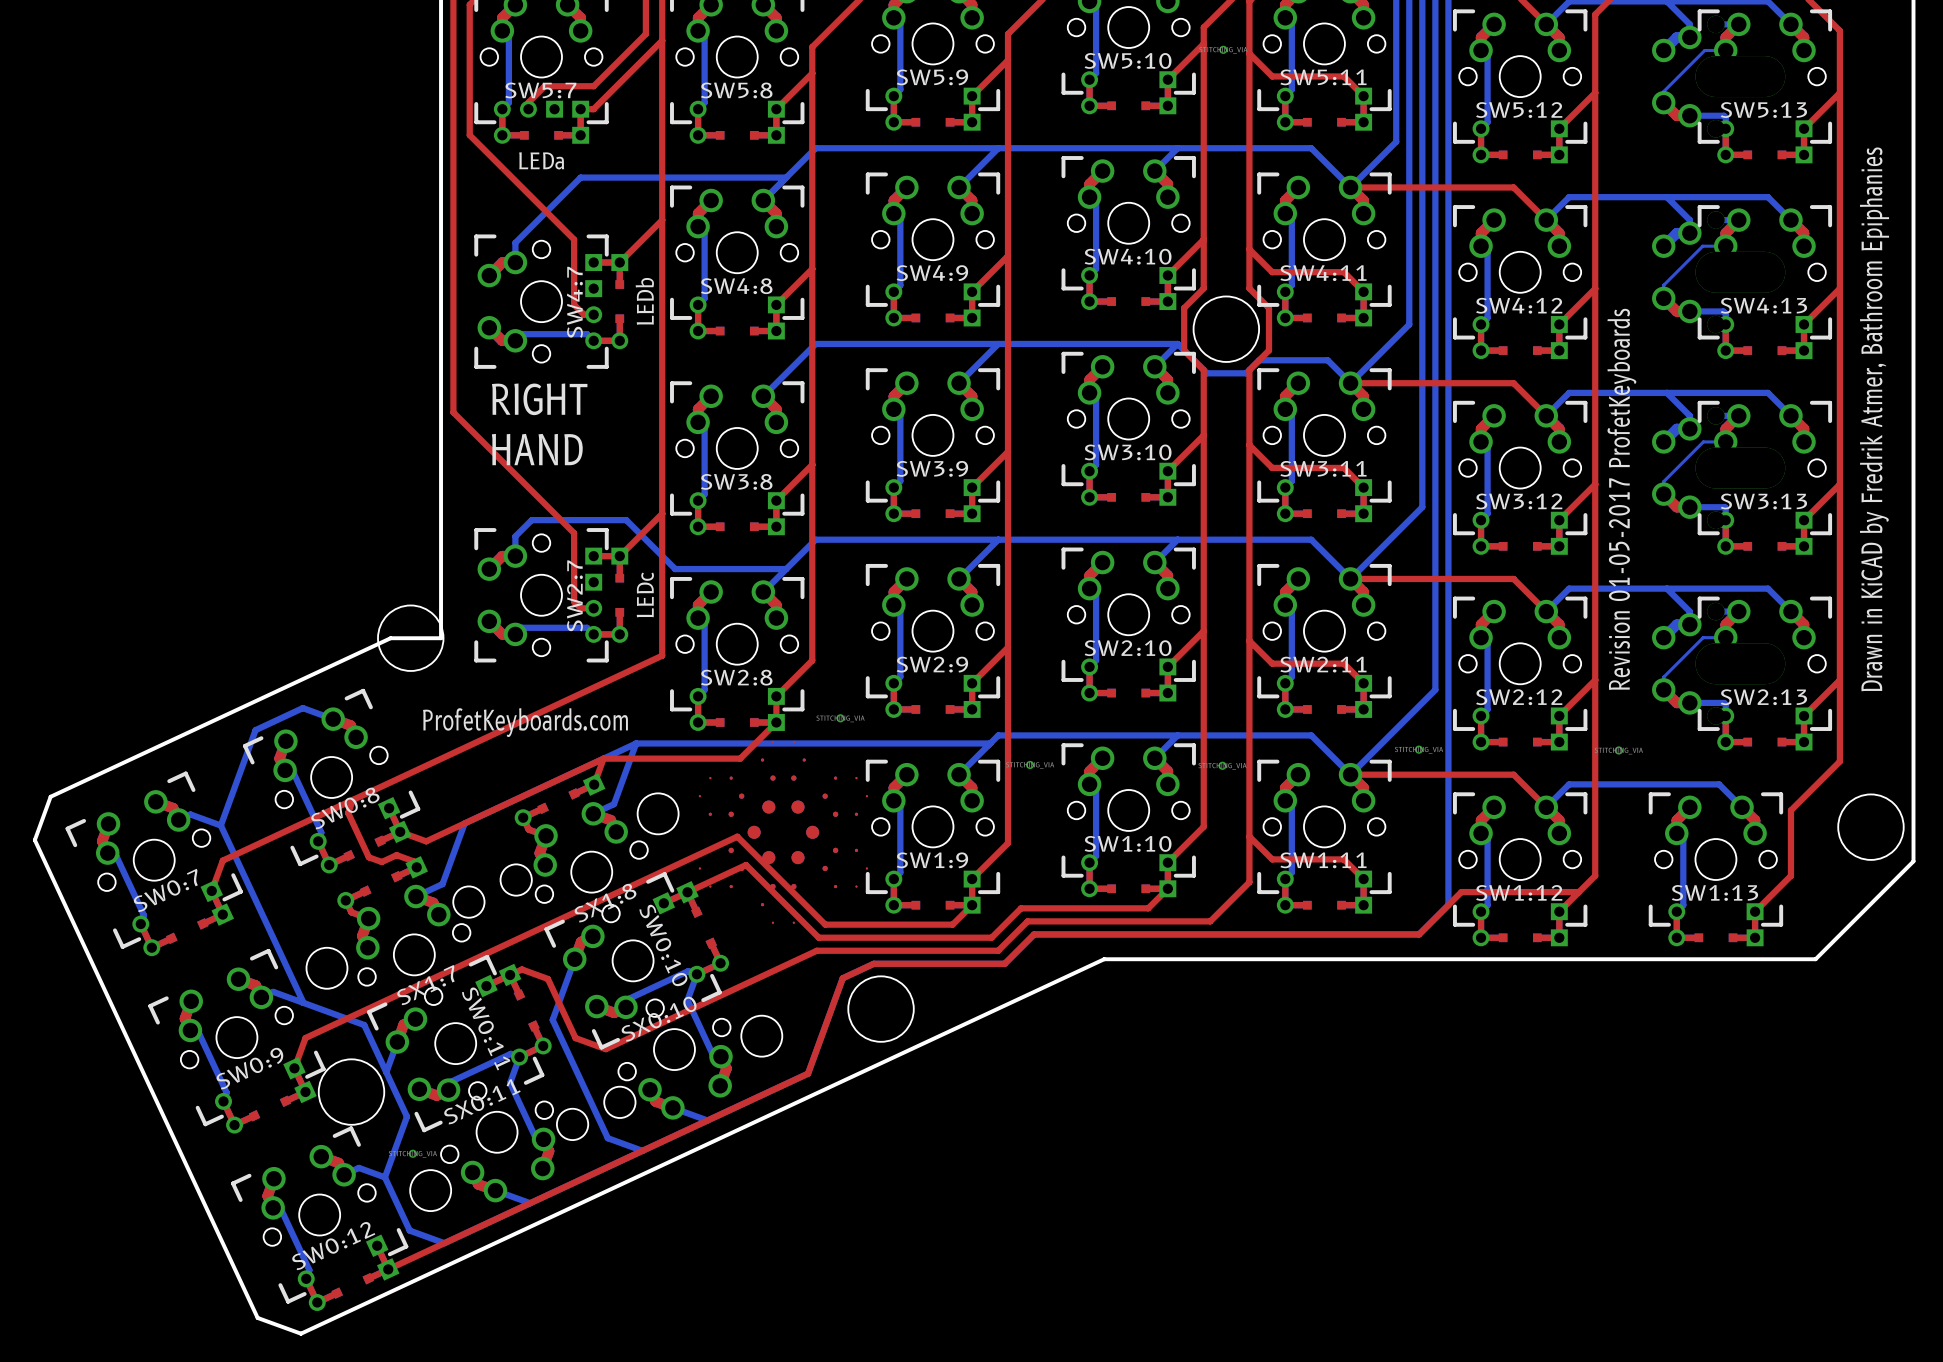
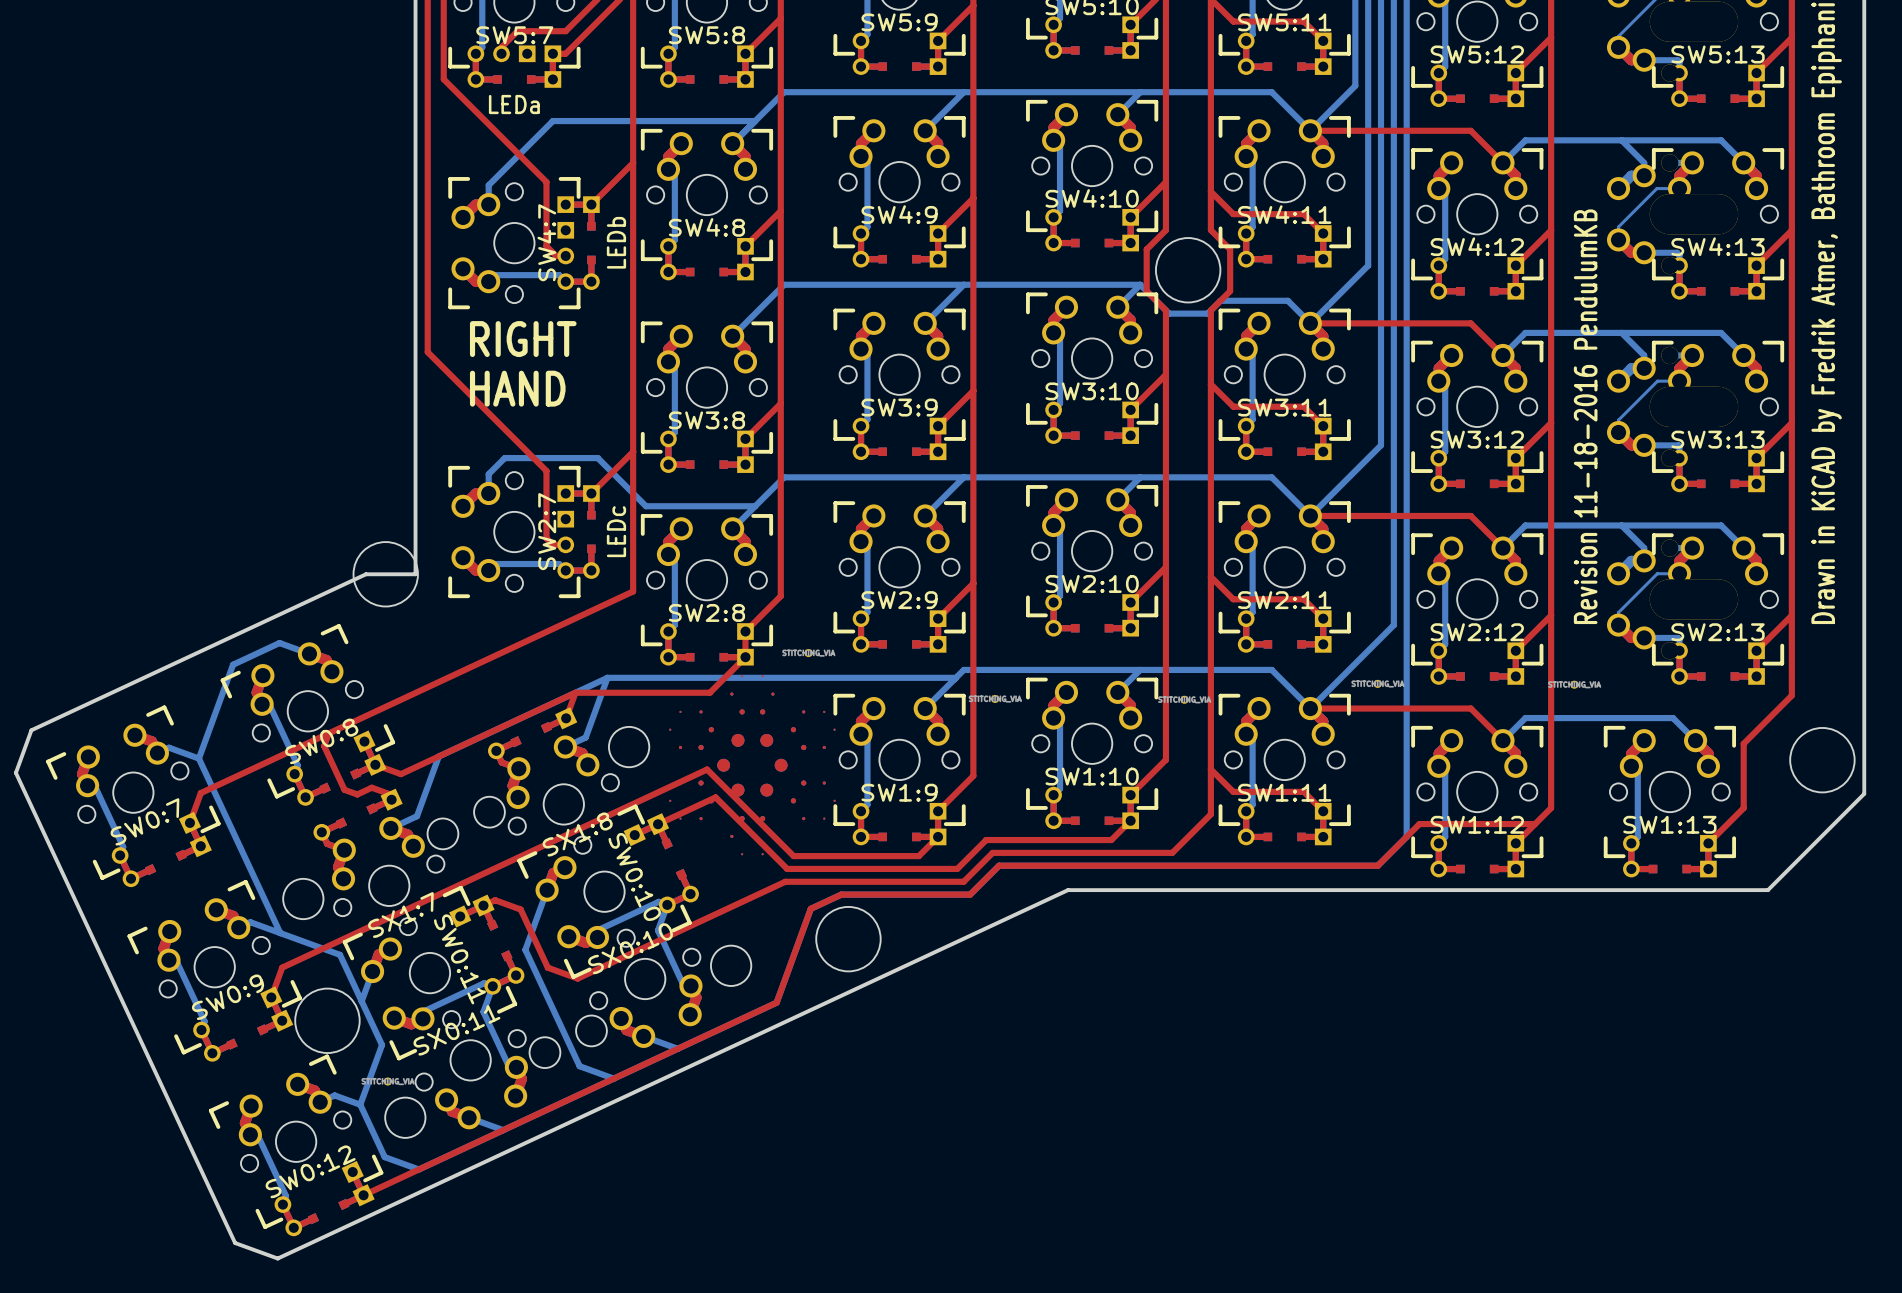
text: Revision 01-05-2017 ProfetKeyboards (1621, 499) -> none
text: none -> Revision 11-18-2016 PendulumKB (1585, 416)
text: ProfetKeyboards.com (525, 722) -> none

